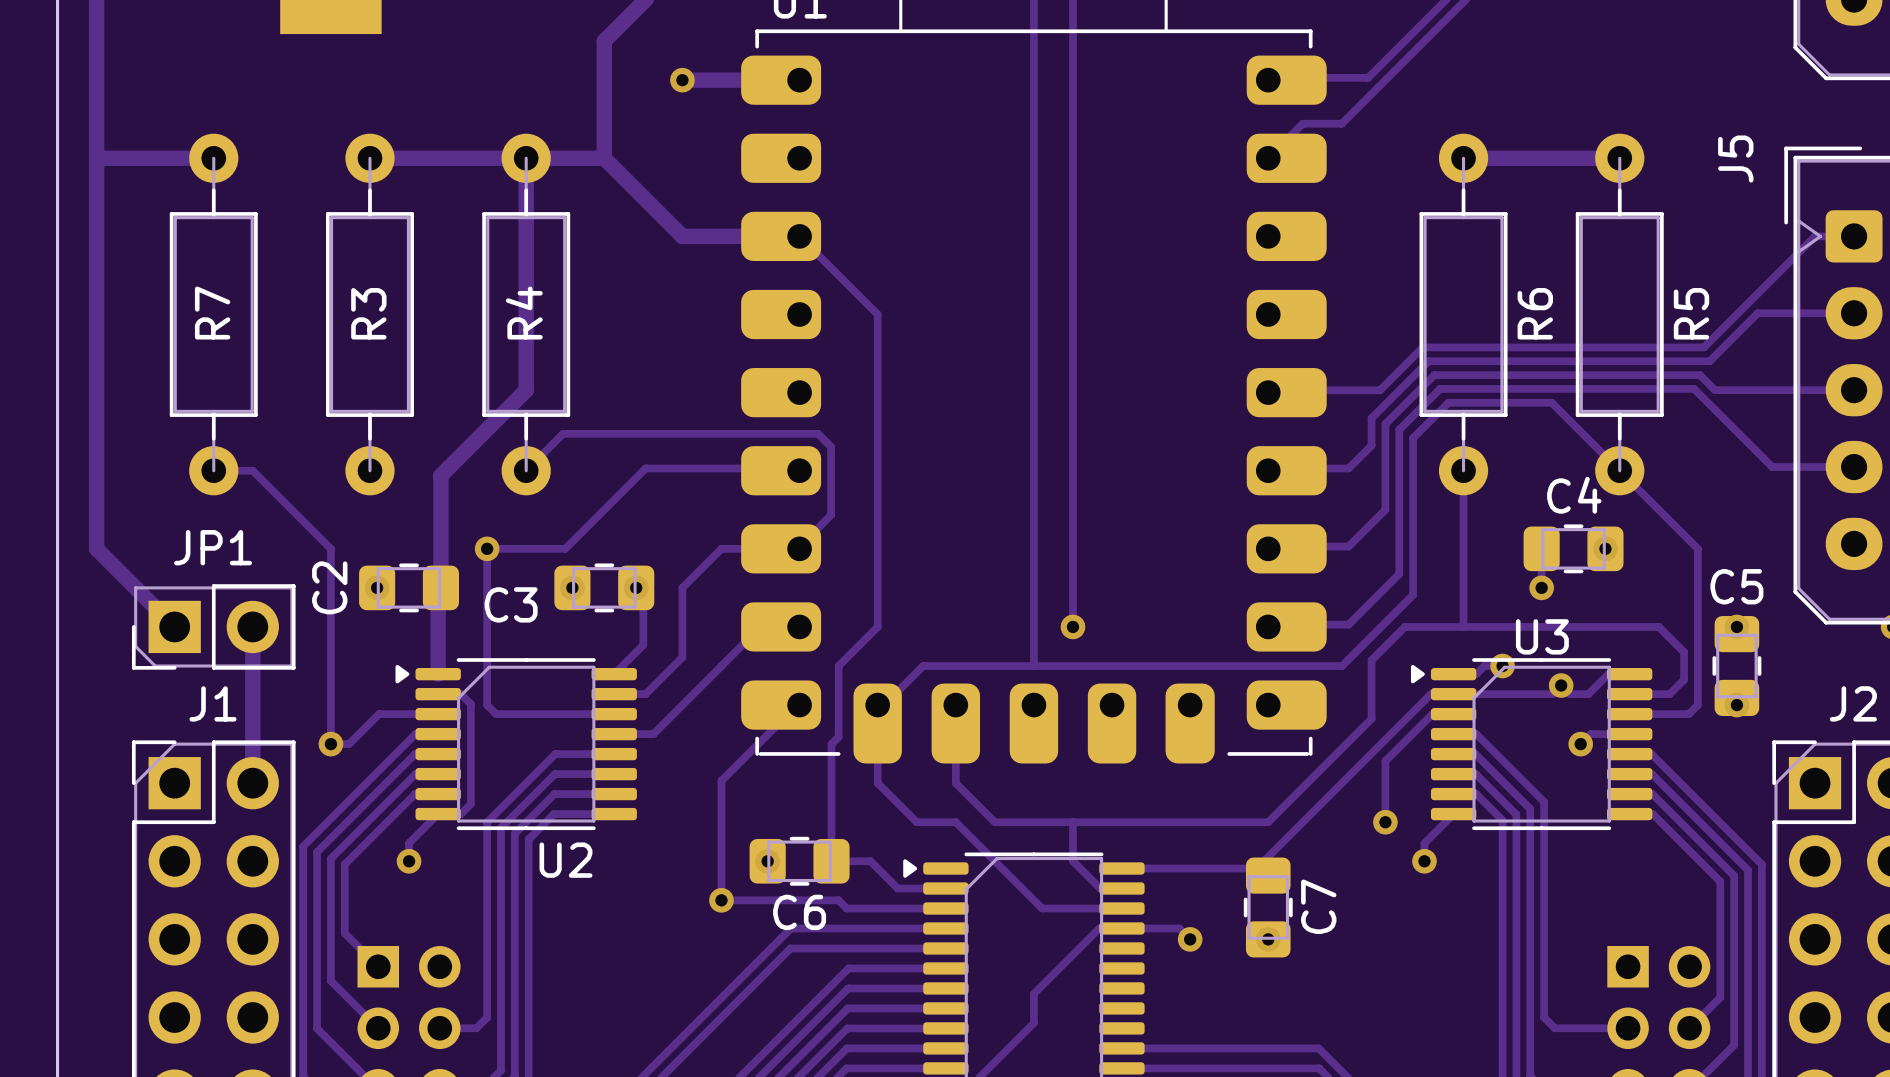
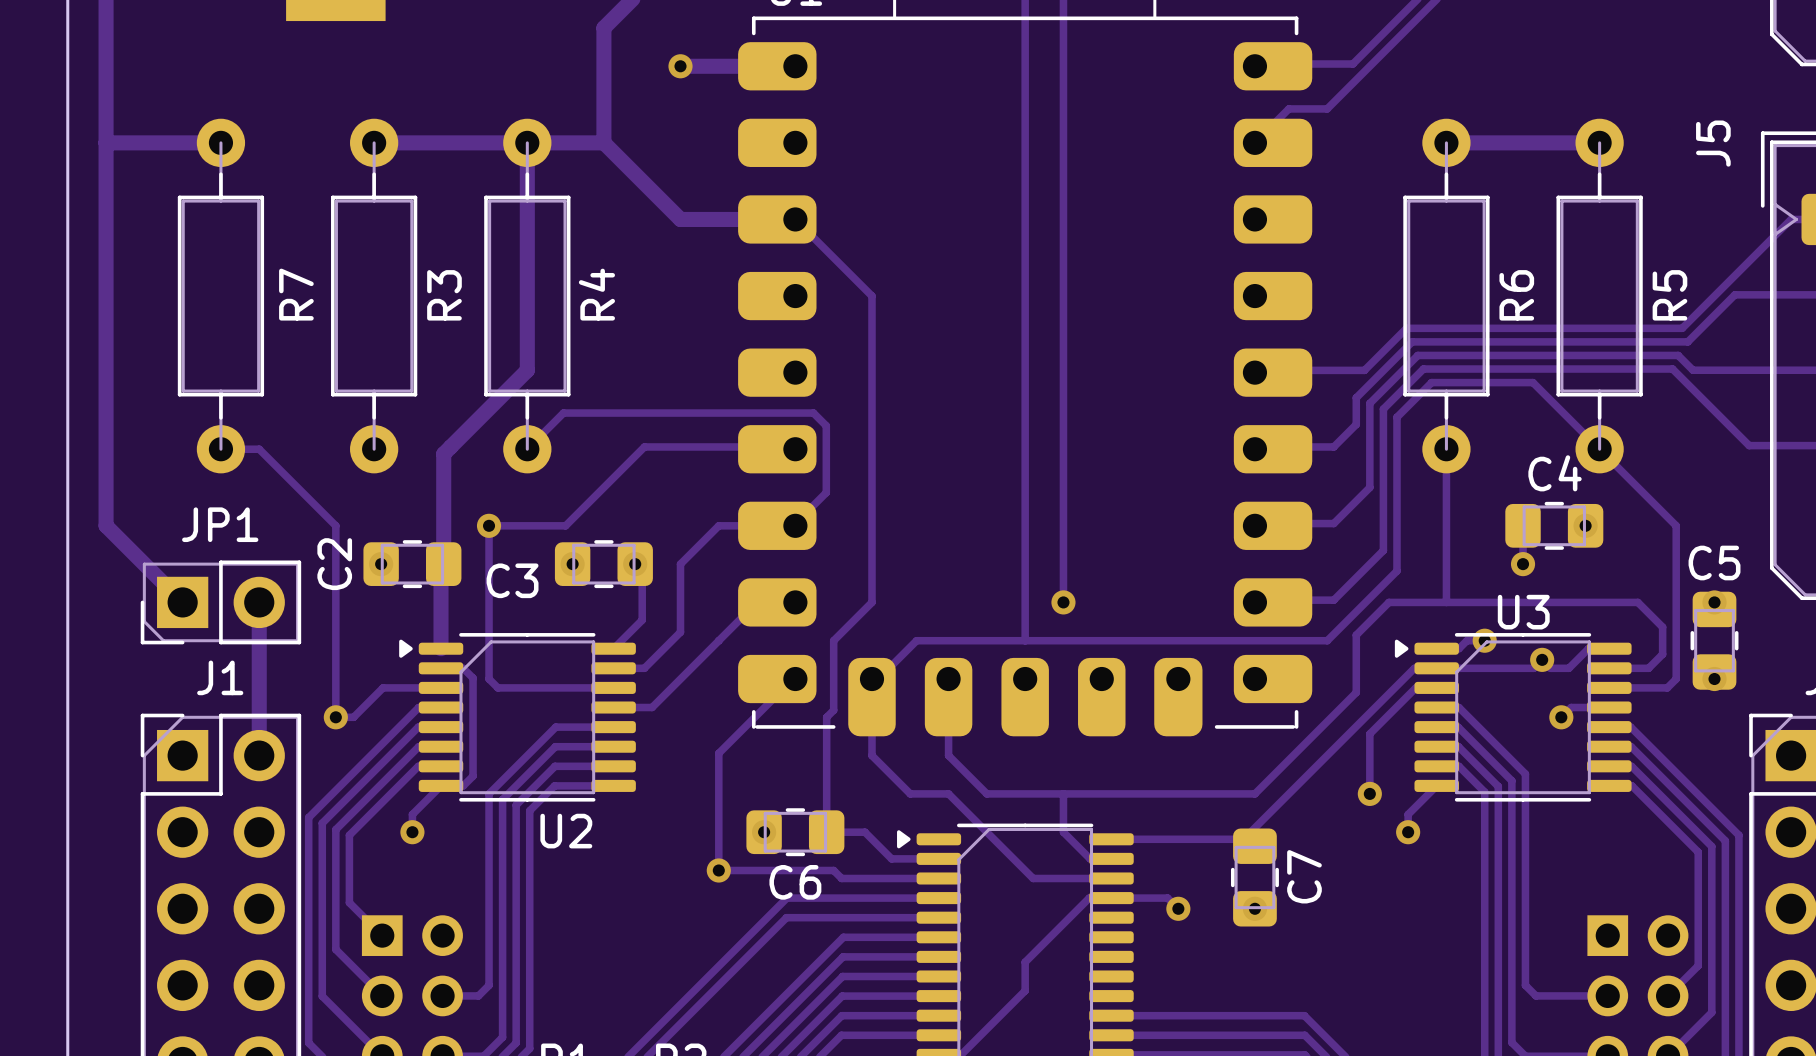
R7 name position: R7 (212, 313) -> R7 (296, 294)
R3 name position: R3 (368, 313) -> R3 (444, 295)
R4 name position: R4 (524, 313) -> R4 (596, 294)

